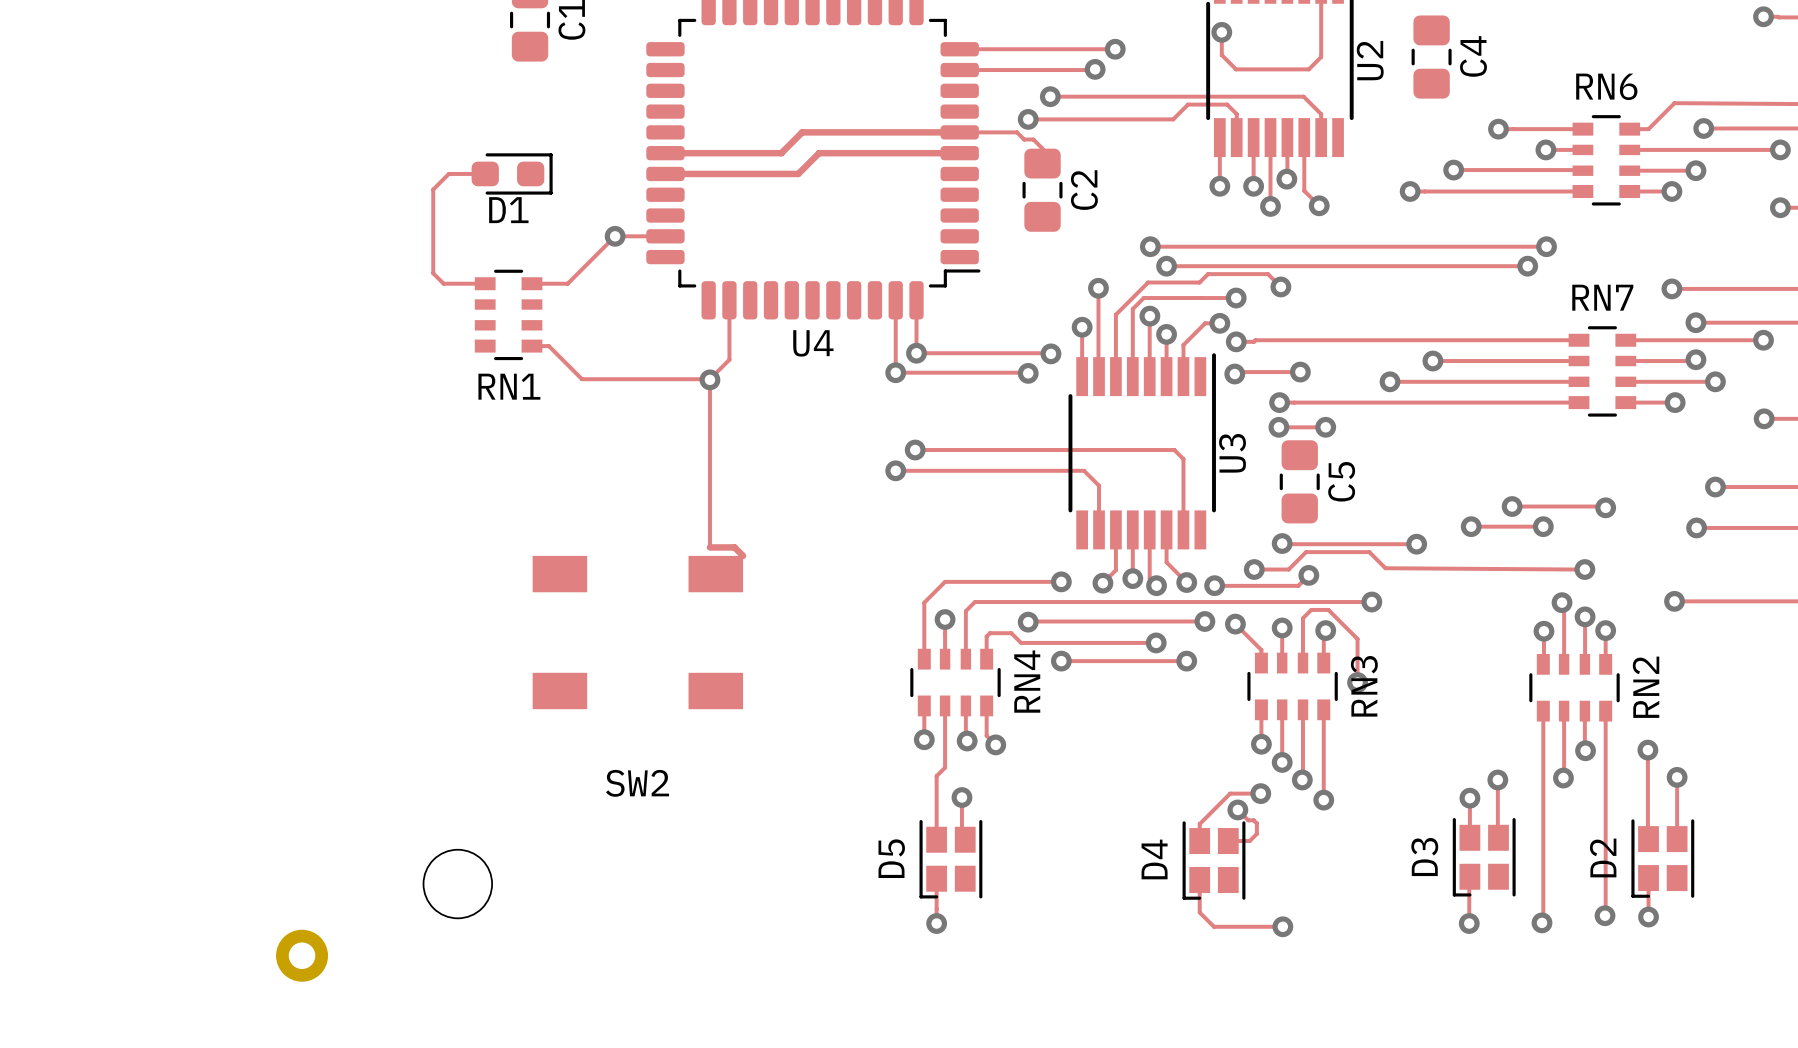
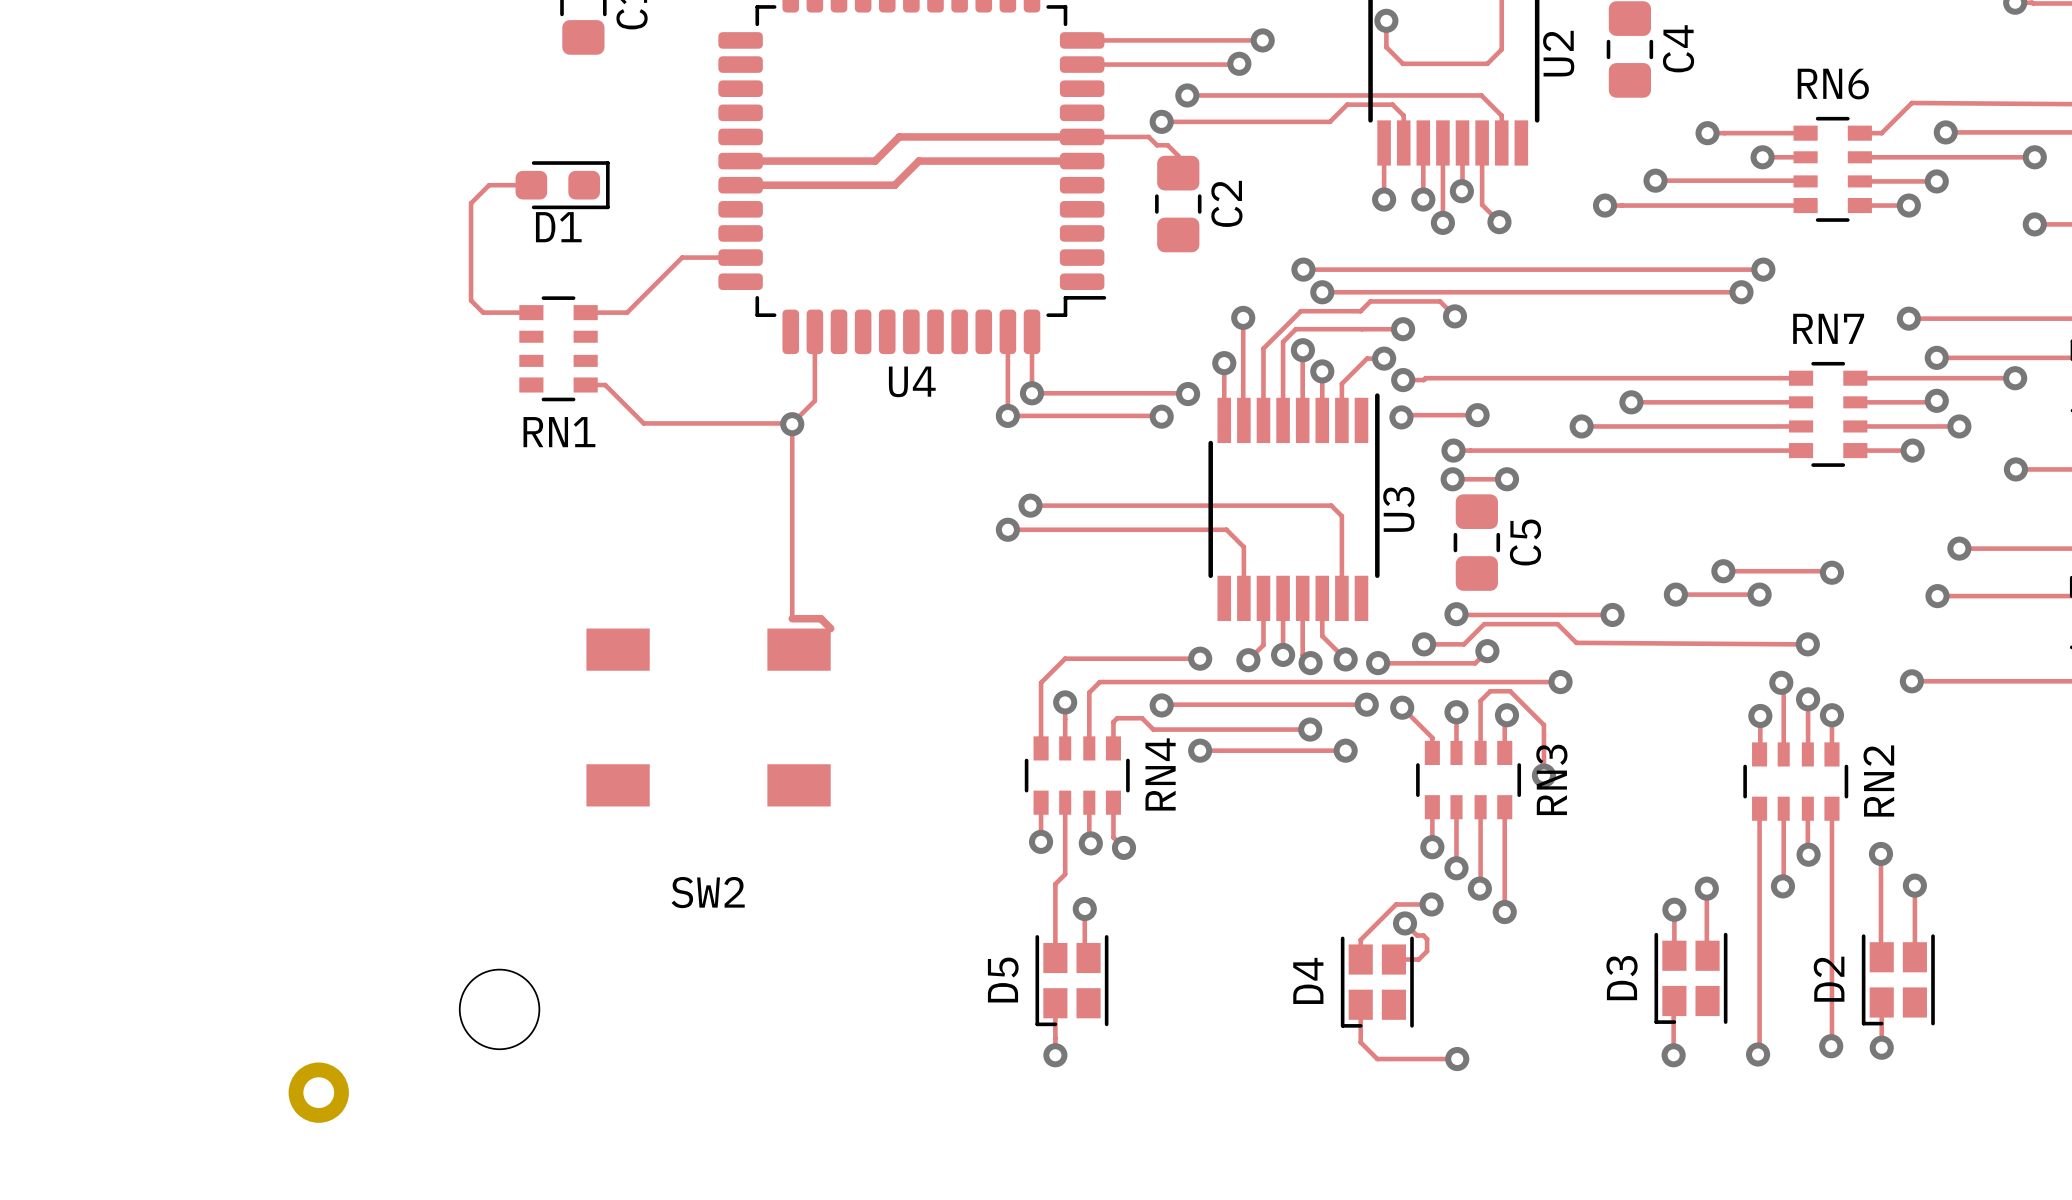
via: (615, 236) -> none

